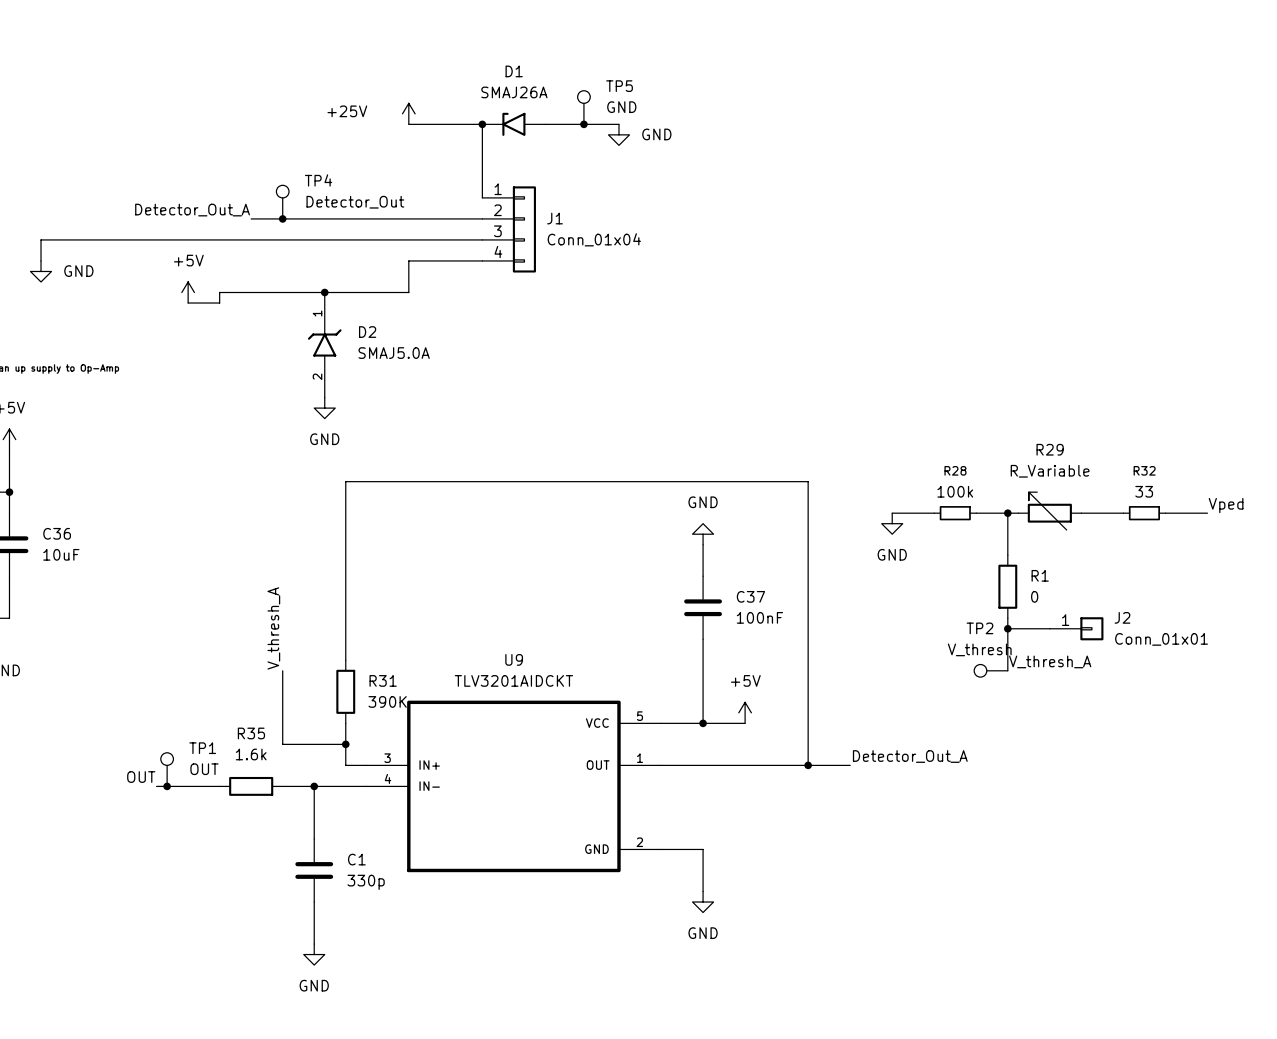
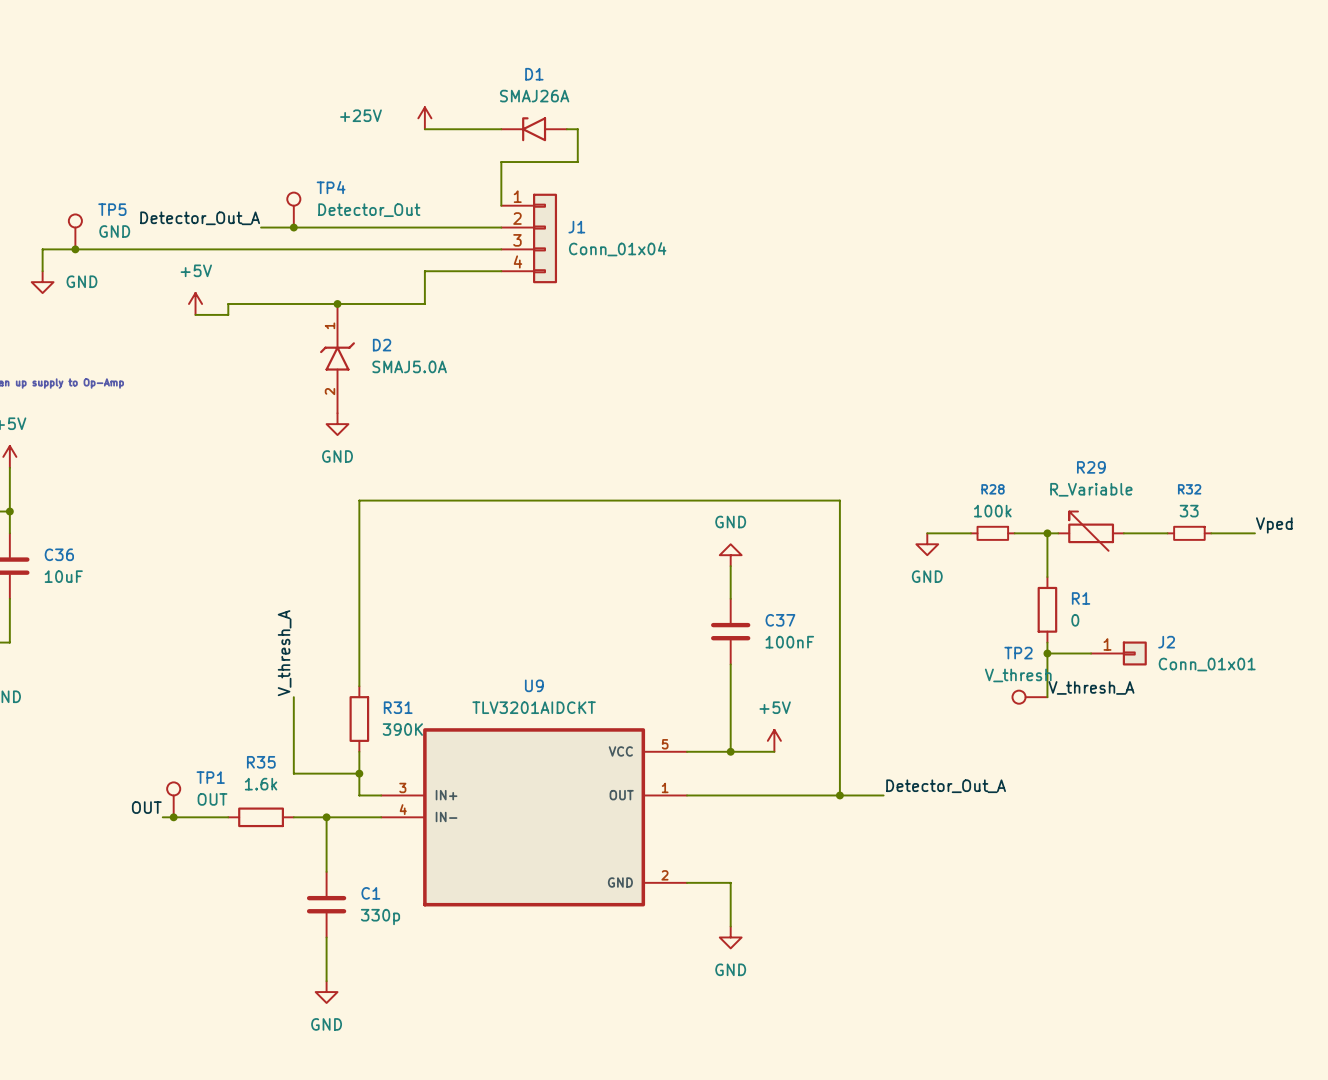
TP5 position: (583, 107) -> (75, 231)
wire: (482, 124) (482, 155) -> (577, 129) (577, 162) (501, 162)
junction: (482, 124) -> none
wire: (555, 124) (618, 124) -> none
junction: (583, 124) -> none
power symbol: GND (618, 134) -> none
junction: none -> (75, 249)

